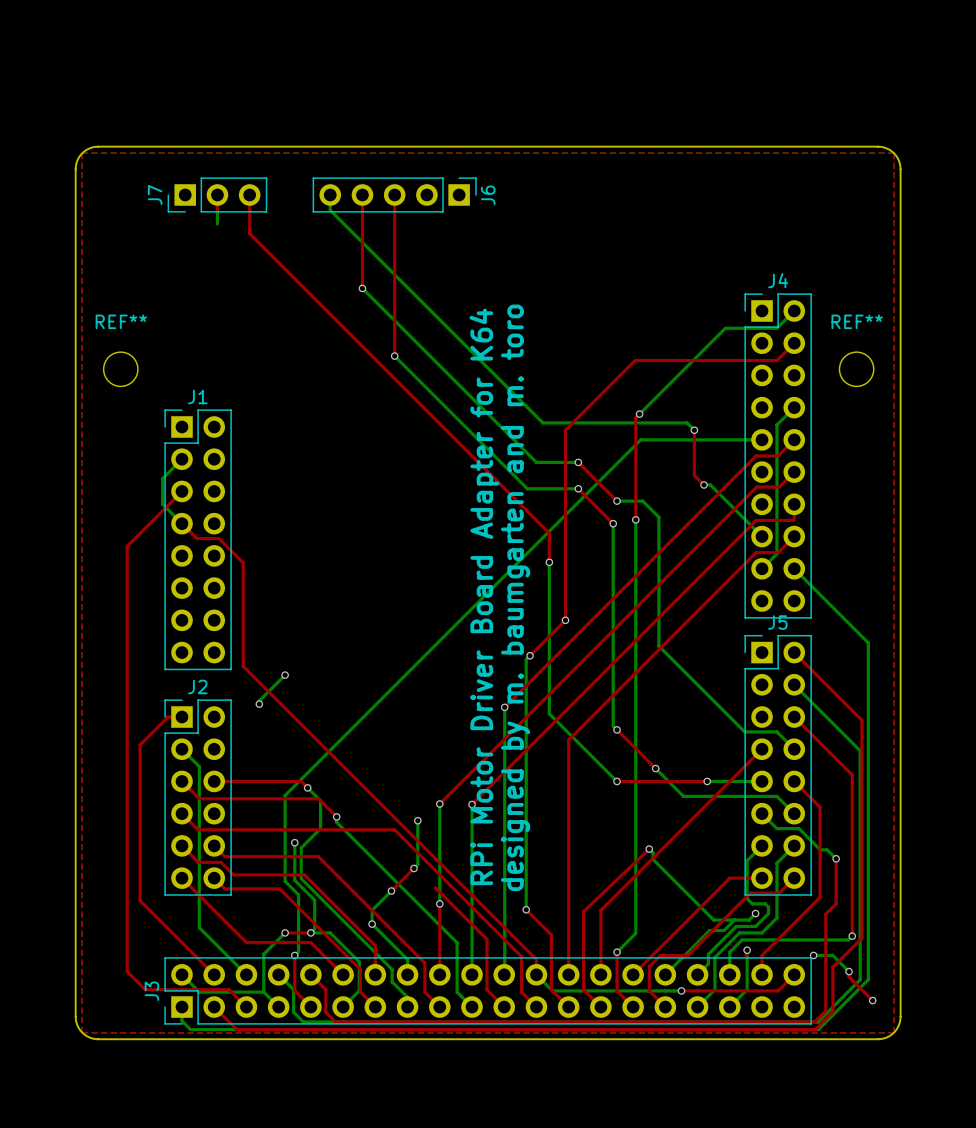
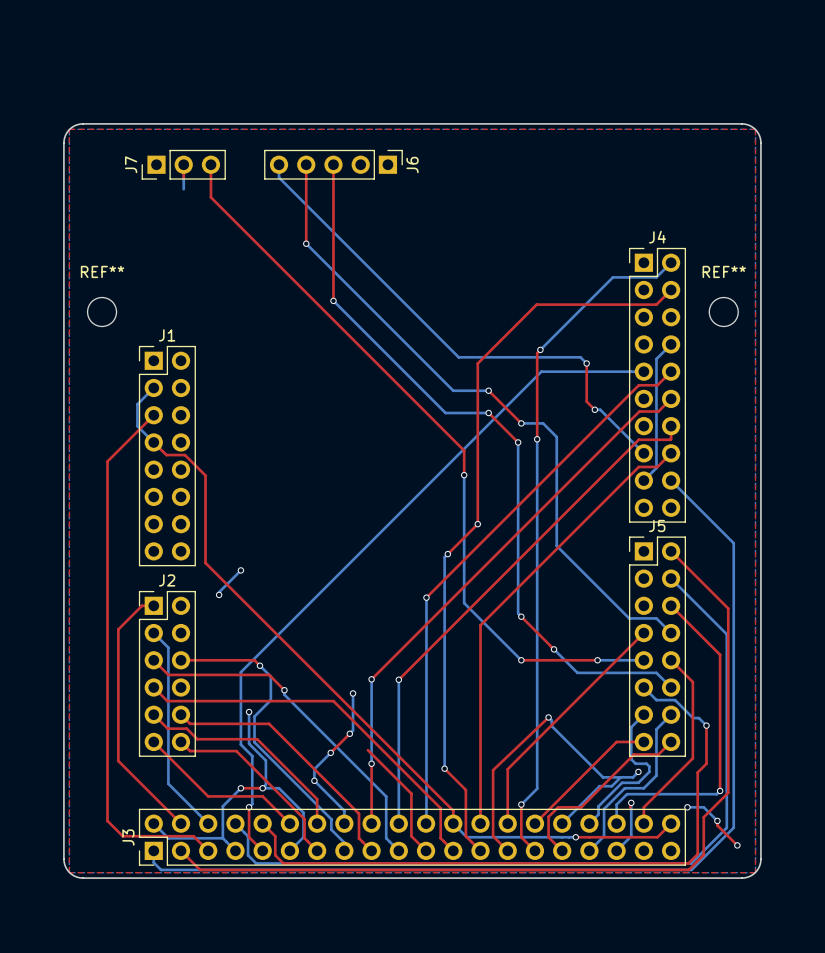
text: RPi Motor Driver Board Adapter for K64 (484, 596) -> none
text: designed by m. baumgarten and m. toro (515, 597) -> none

